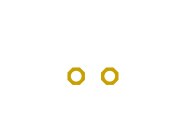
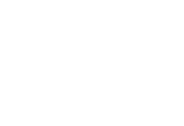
part: (92, 76) -> none

